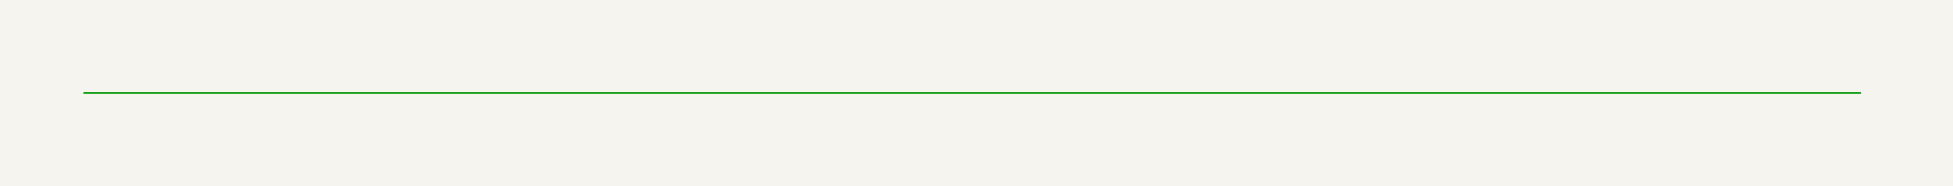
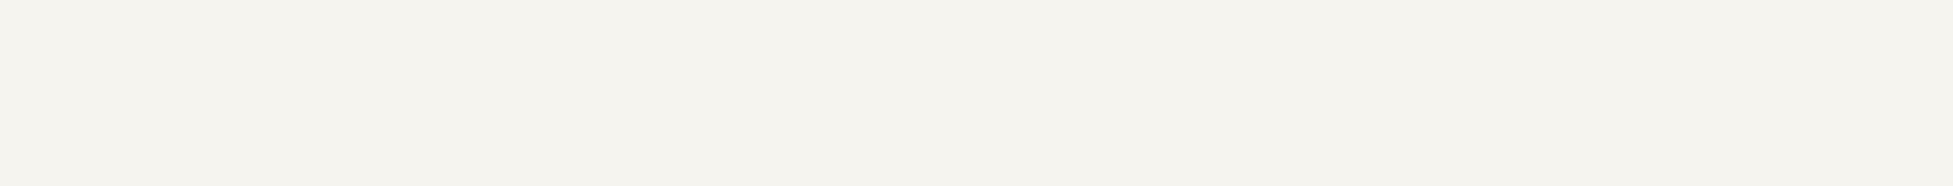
wire: (84, 92) (1860, 92) -> none

